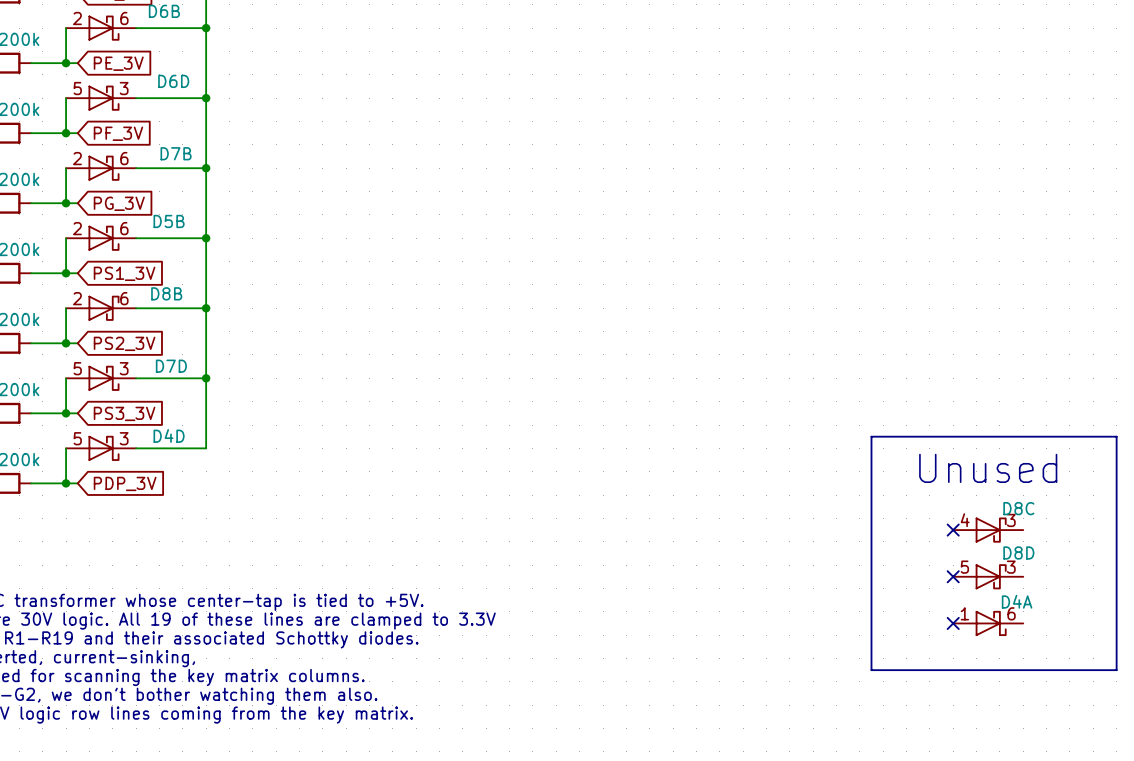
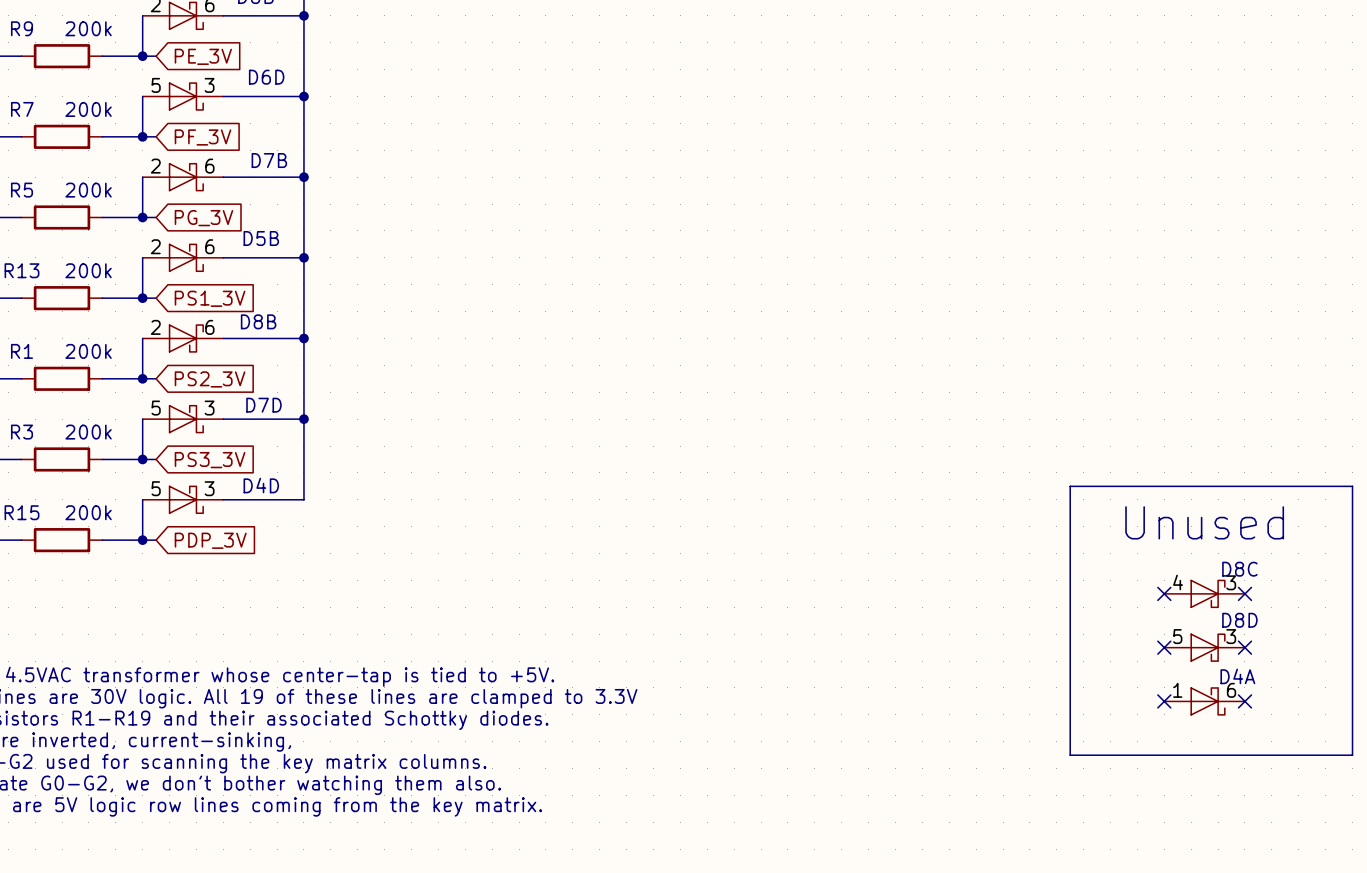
no-connect mark: none -> (1244, 593)
no-connect mark: none -> (1244, 647)
no-connect mark: none -> (1244, 701)

